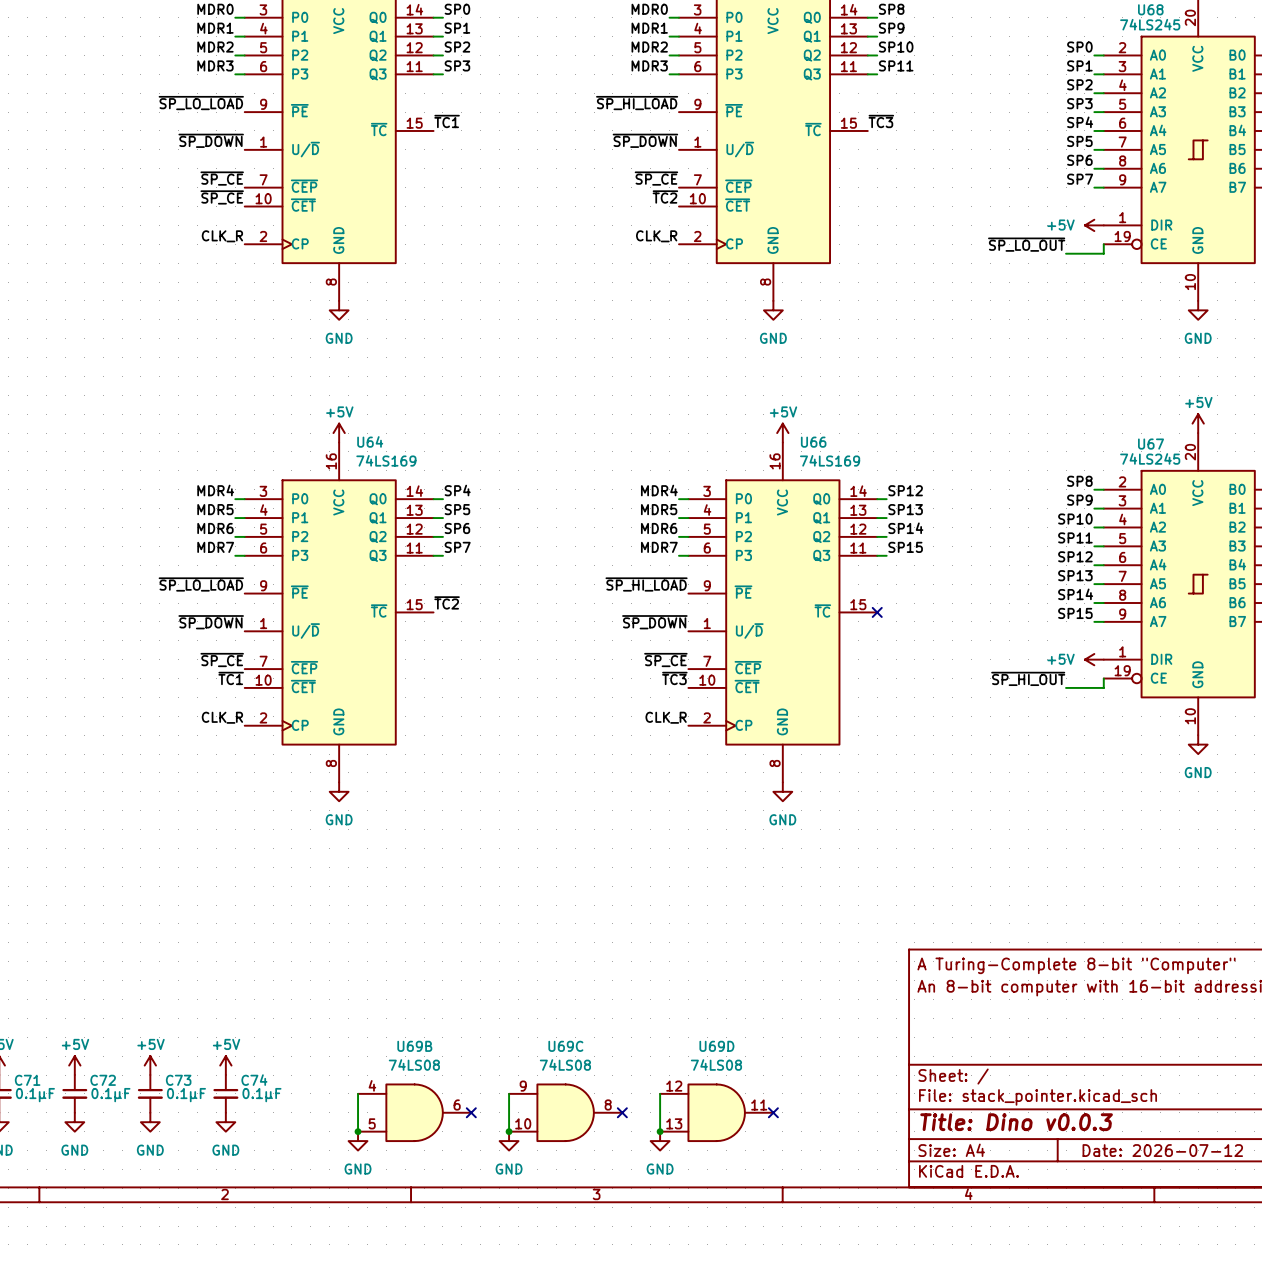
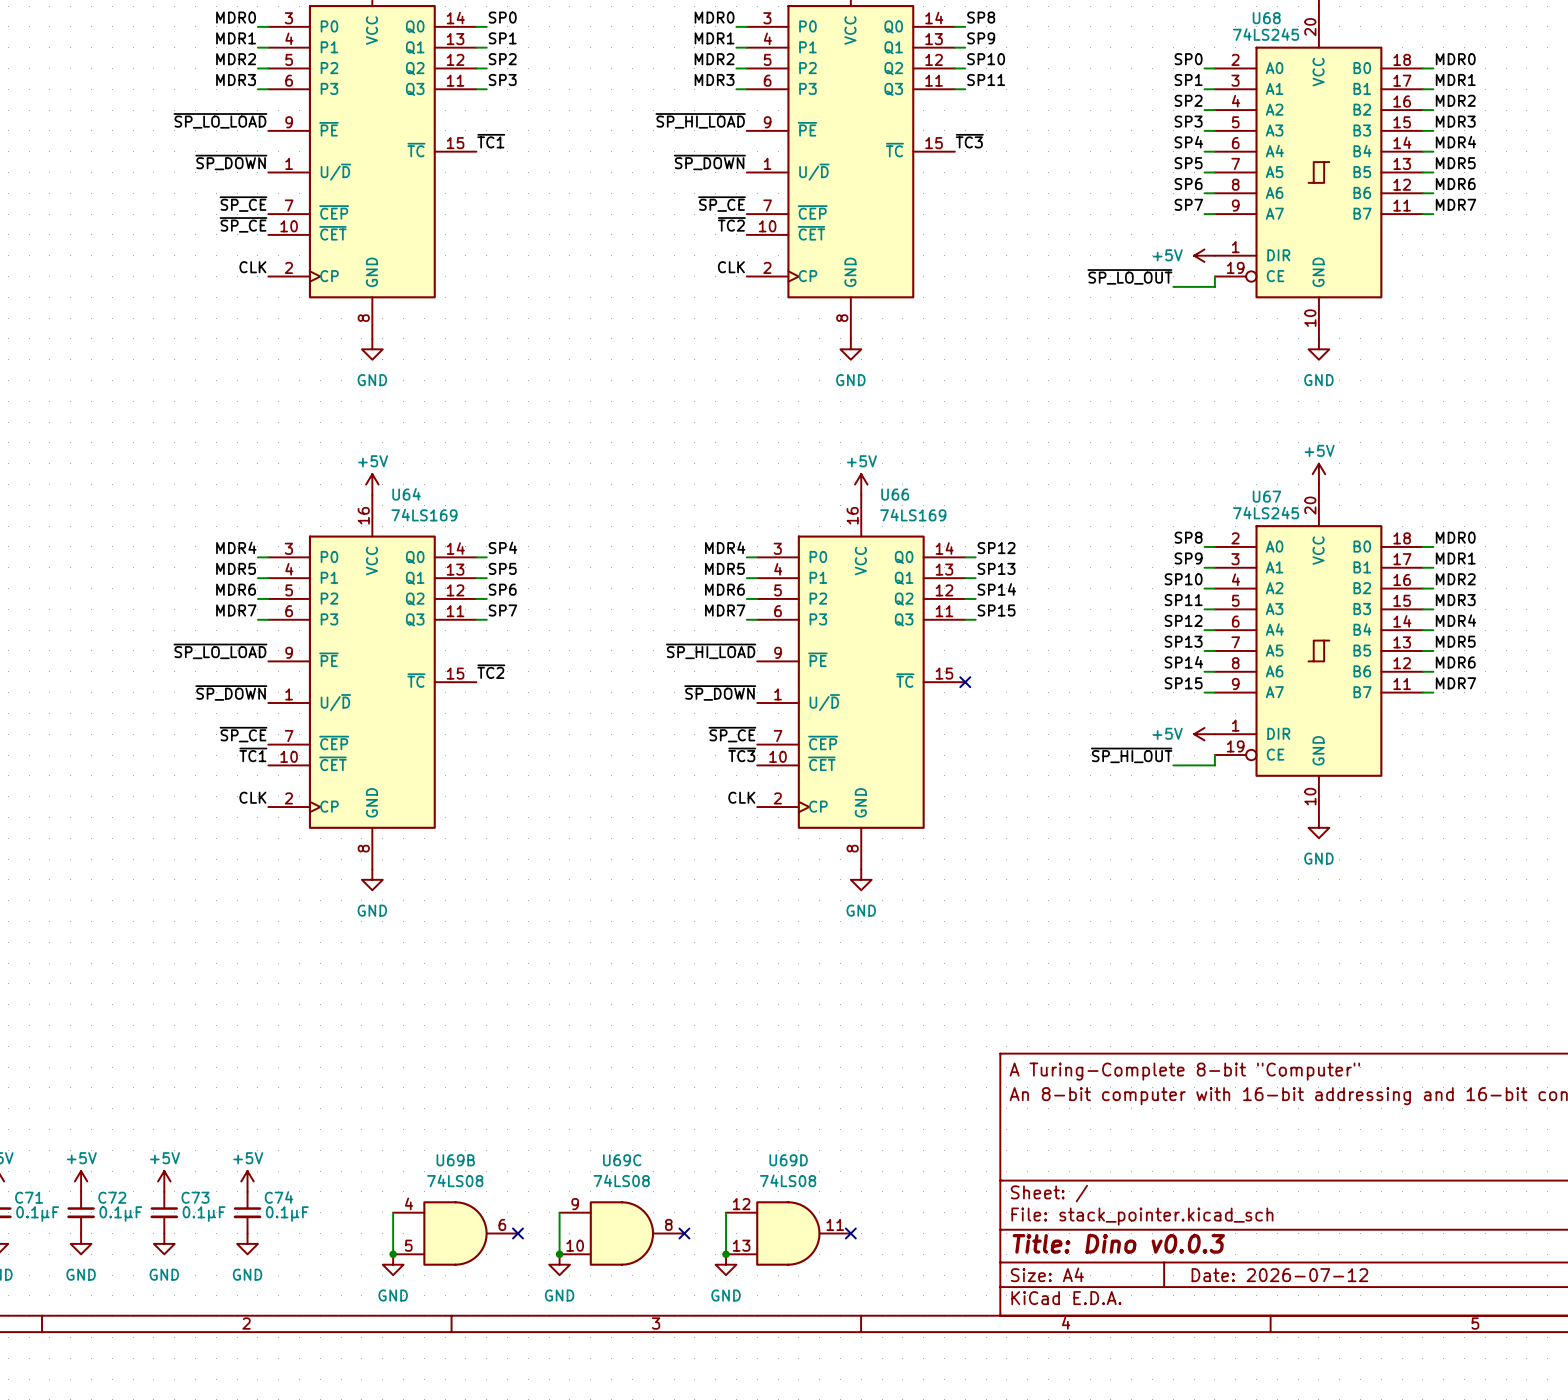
label: CLK_R (222, 236) -> CLK (252, 267)
label: CLK_R (656, 236) -> CLK (731, 267)
label: CLK_R (222, 717) -> CLK (252, 797)
label: CLK_R (666, 717) -> CLK (741, 797)

